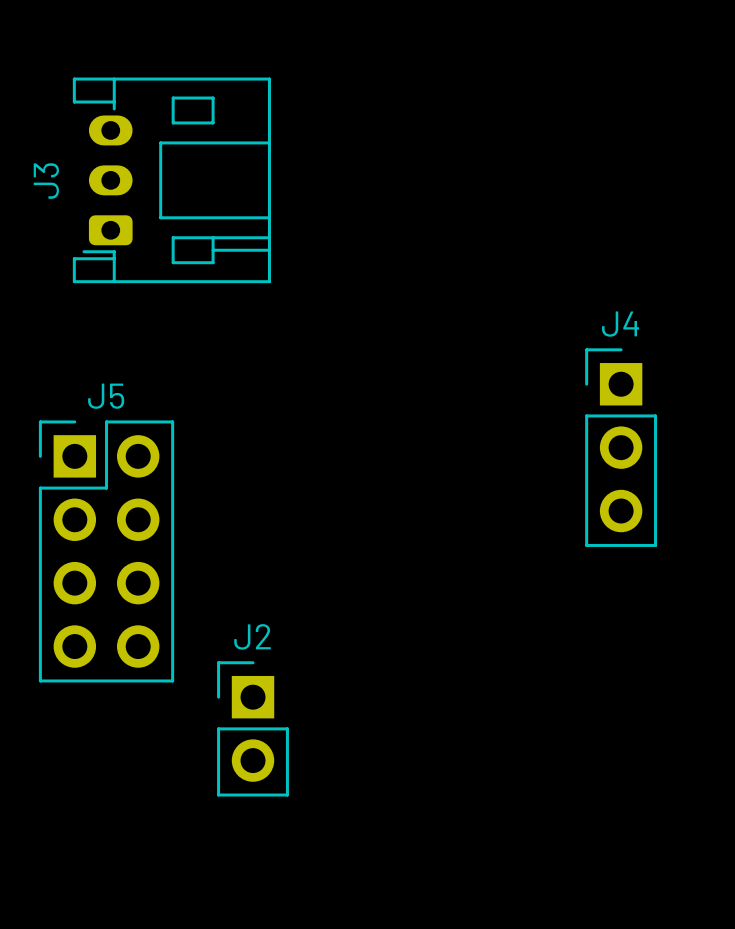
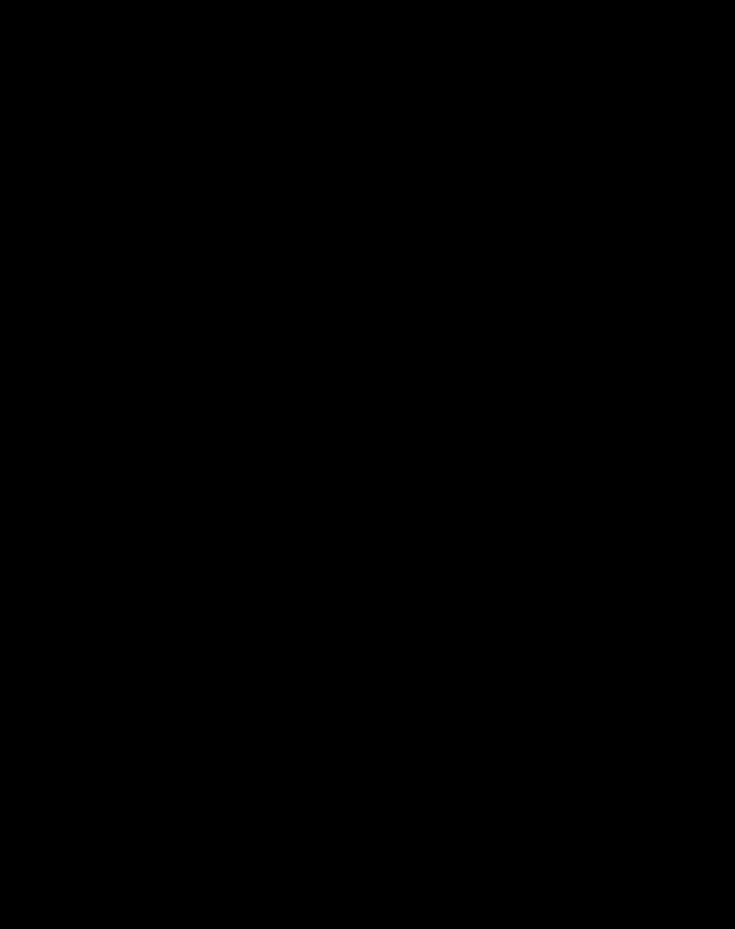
J3: (171, 180) -> none
J4: (621, 447) -> none
J5: (106, 551) -> none
J2: (253, 728) -> none

